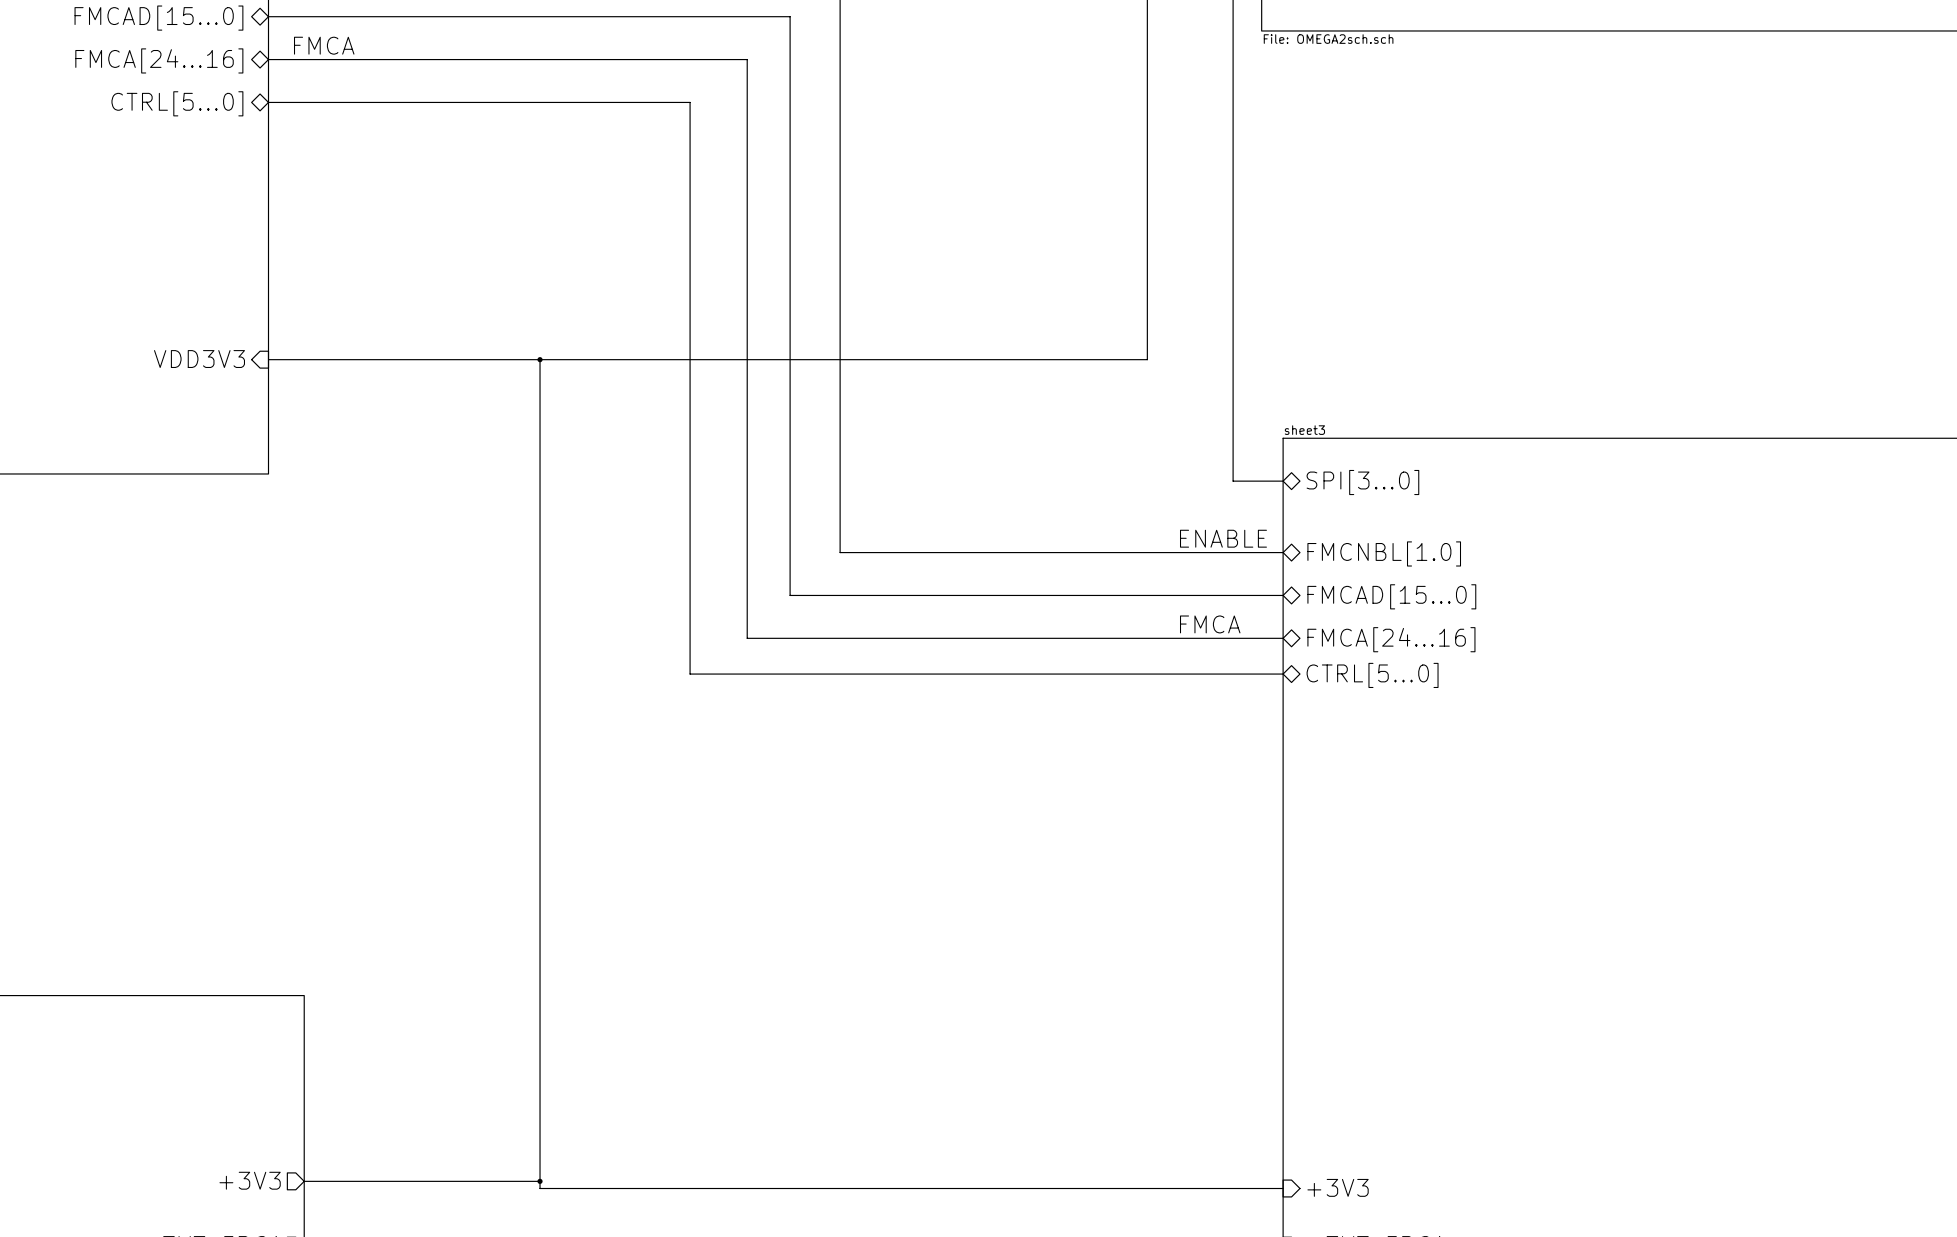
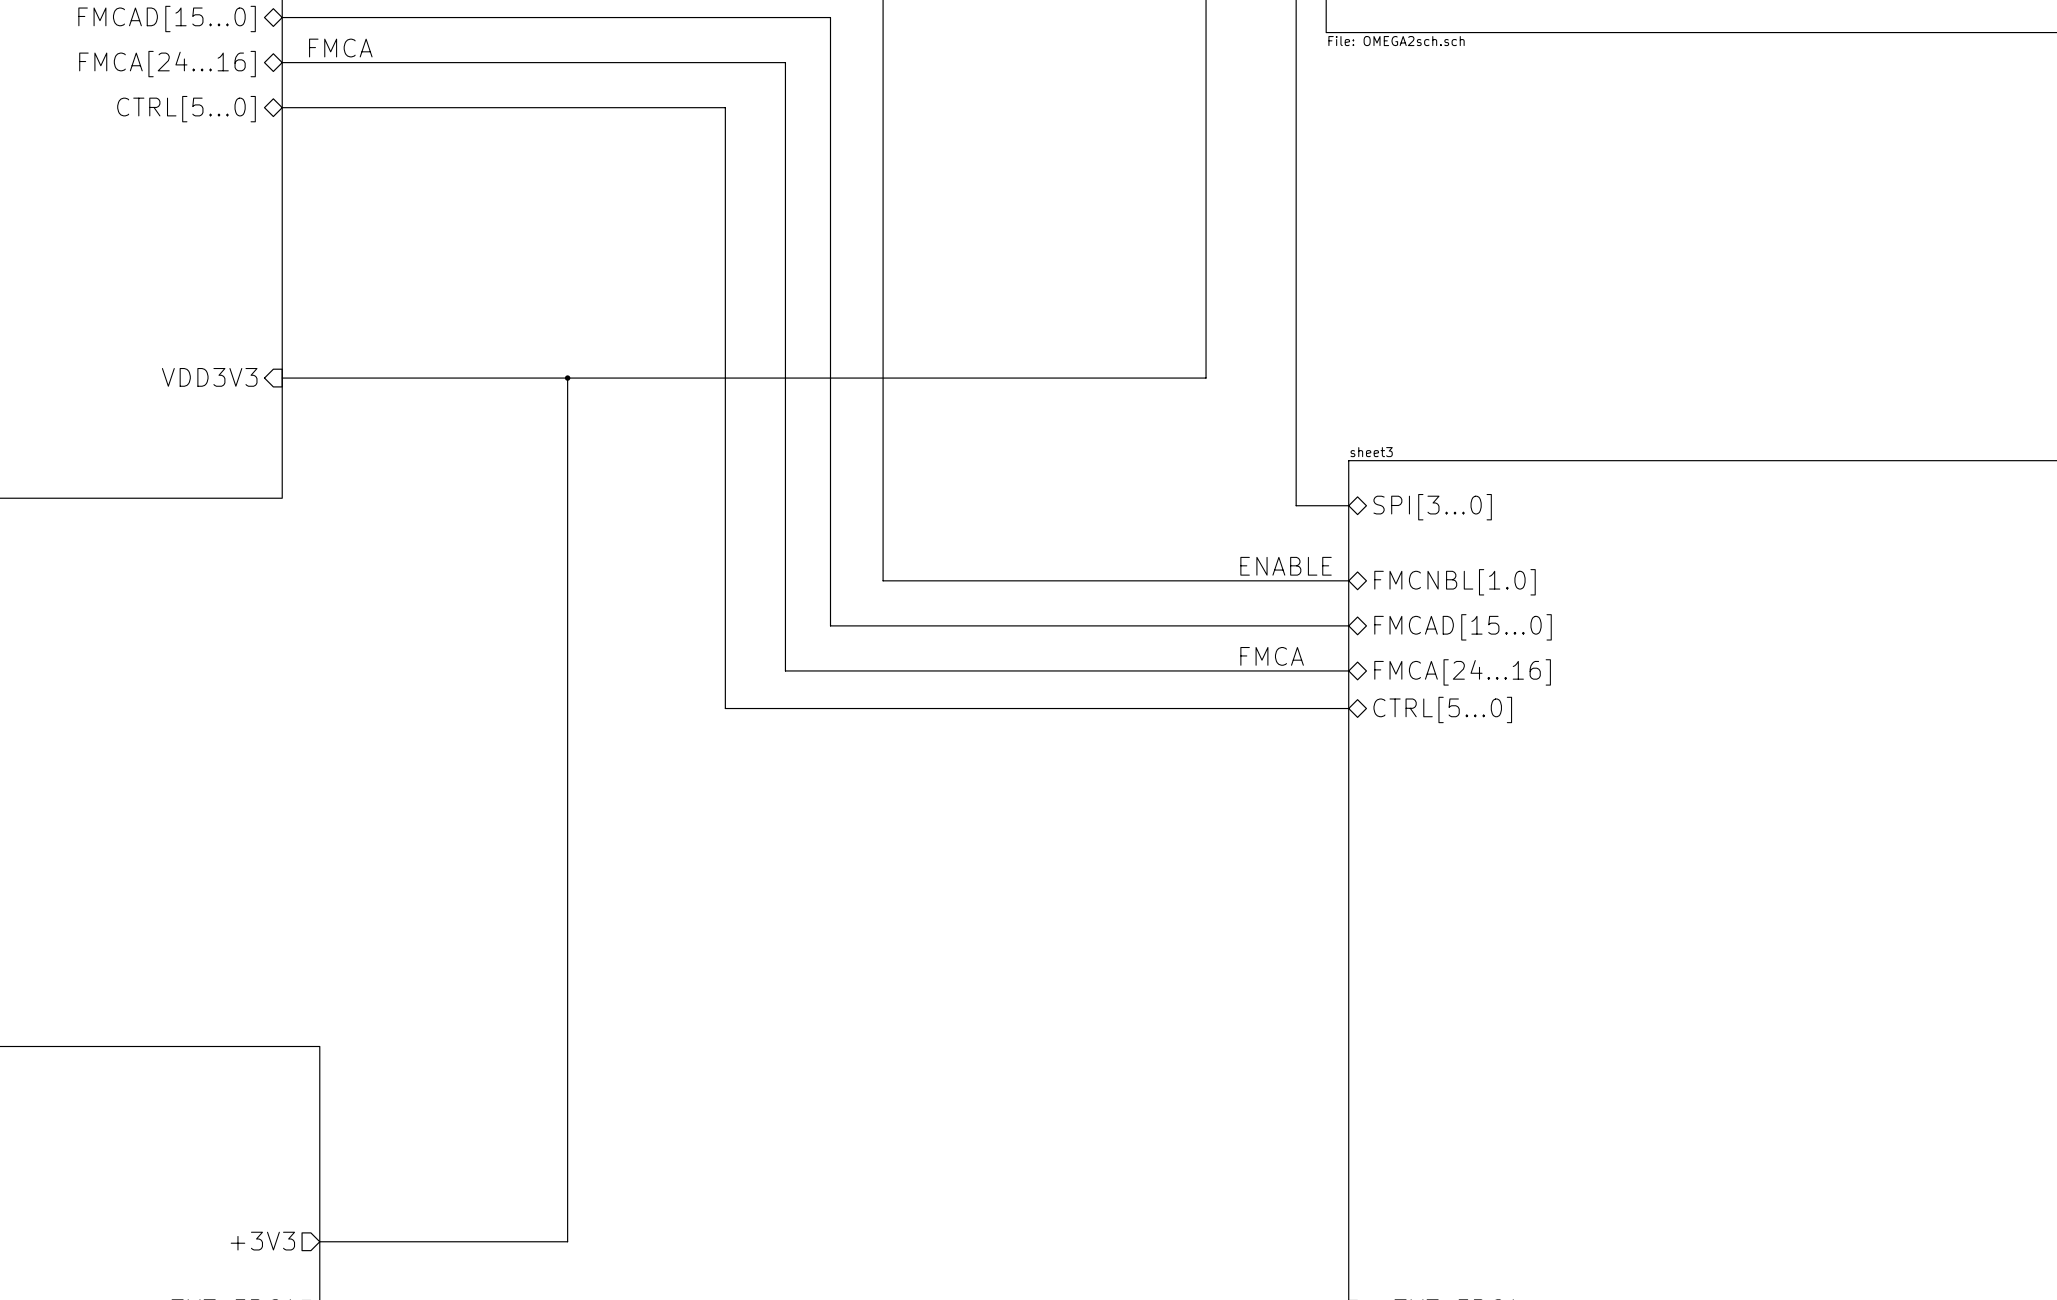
wire: (540, 1181) (540, 1188) (1283, 1188) -> none
junction: (540, 1181) -> none
sheet pin: +3V3 (1338, 1187) -> none

